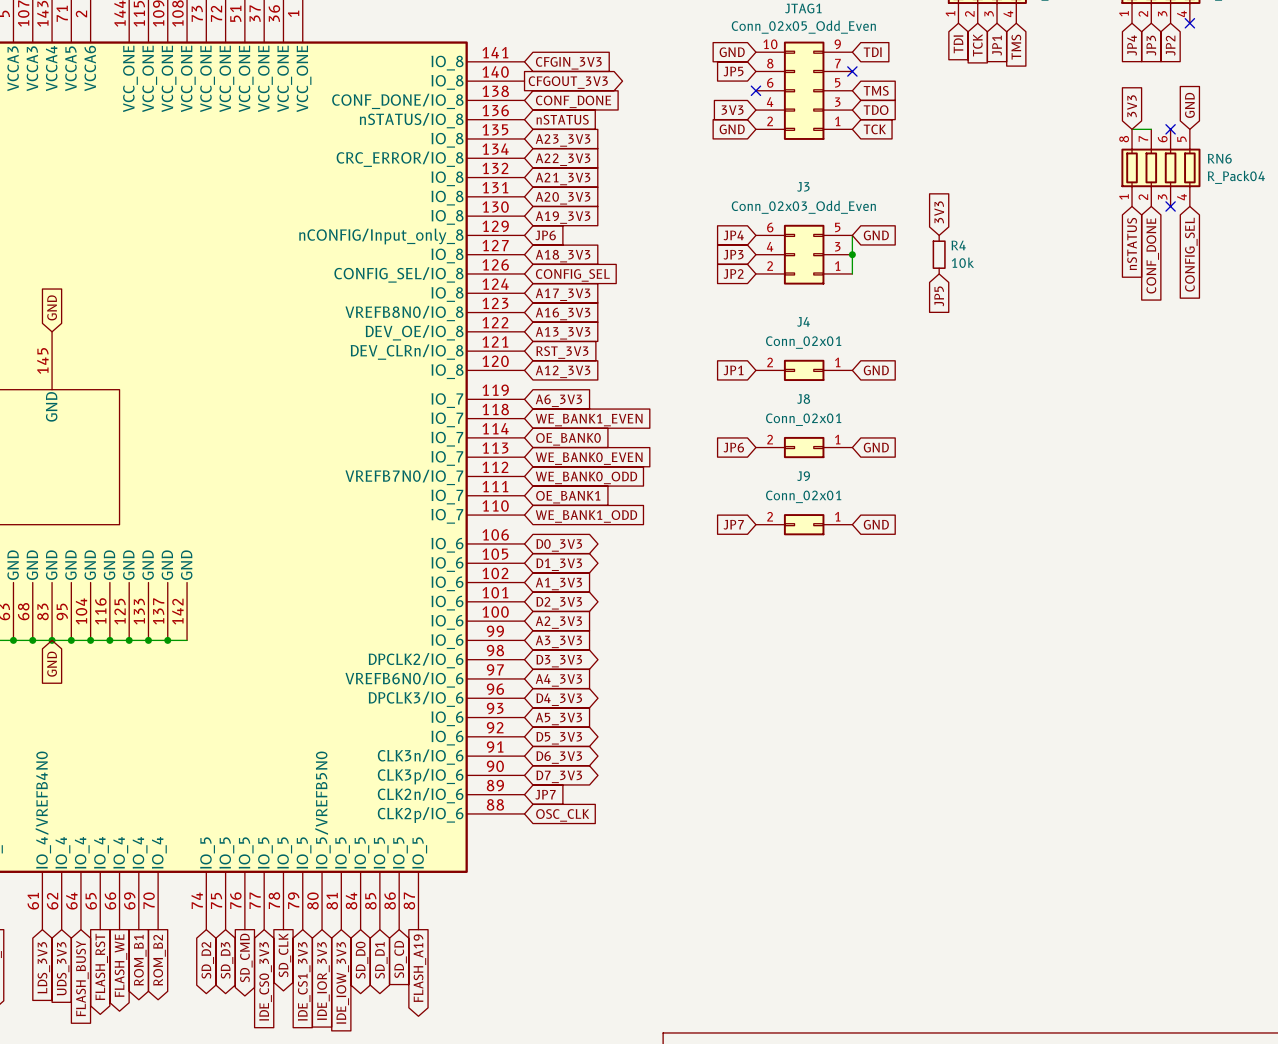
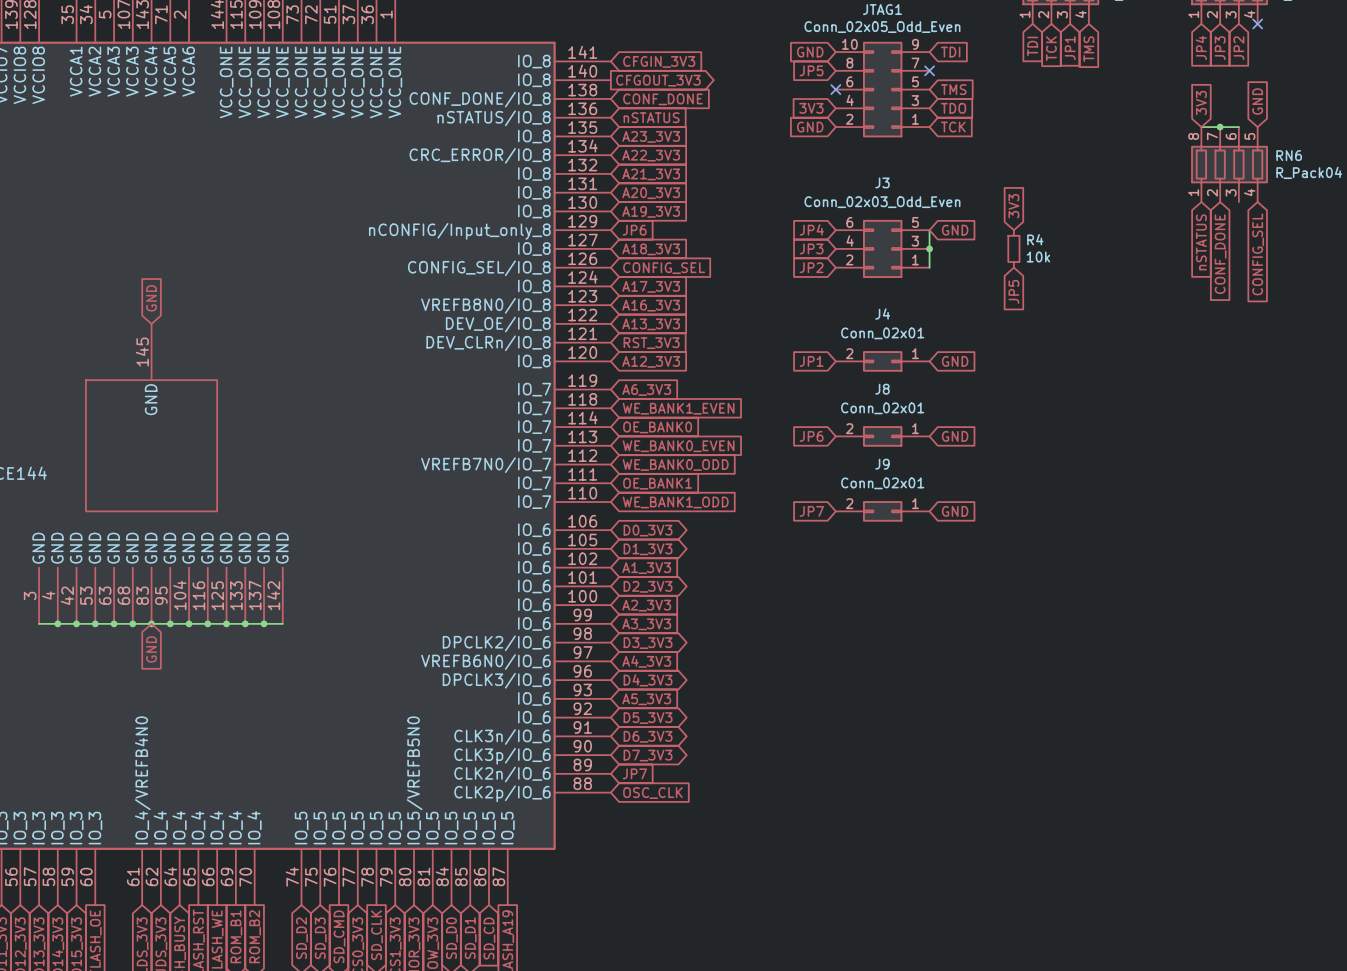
wire: none -> (1220, 127) (1238, 127)
junction: none -> (1220, 127)
no-connect mark: (1170, 129) -> none
no-connect mark: (1170, 206) -> none

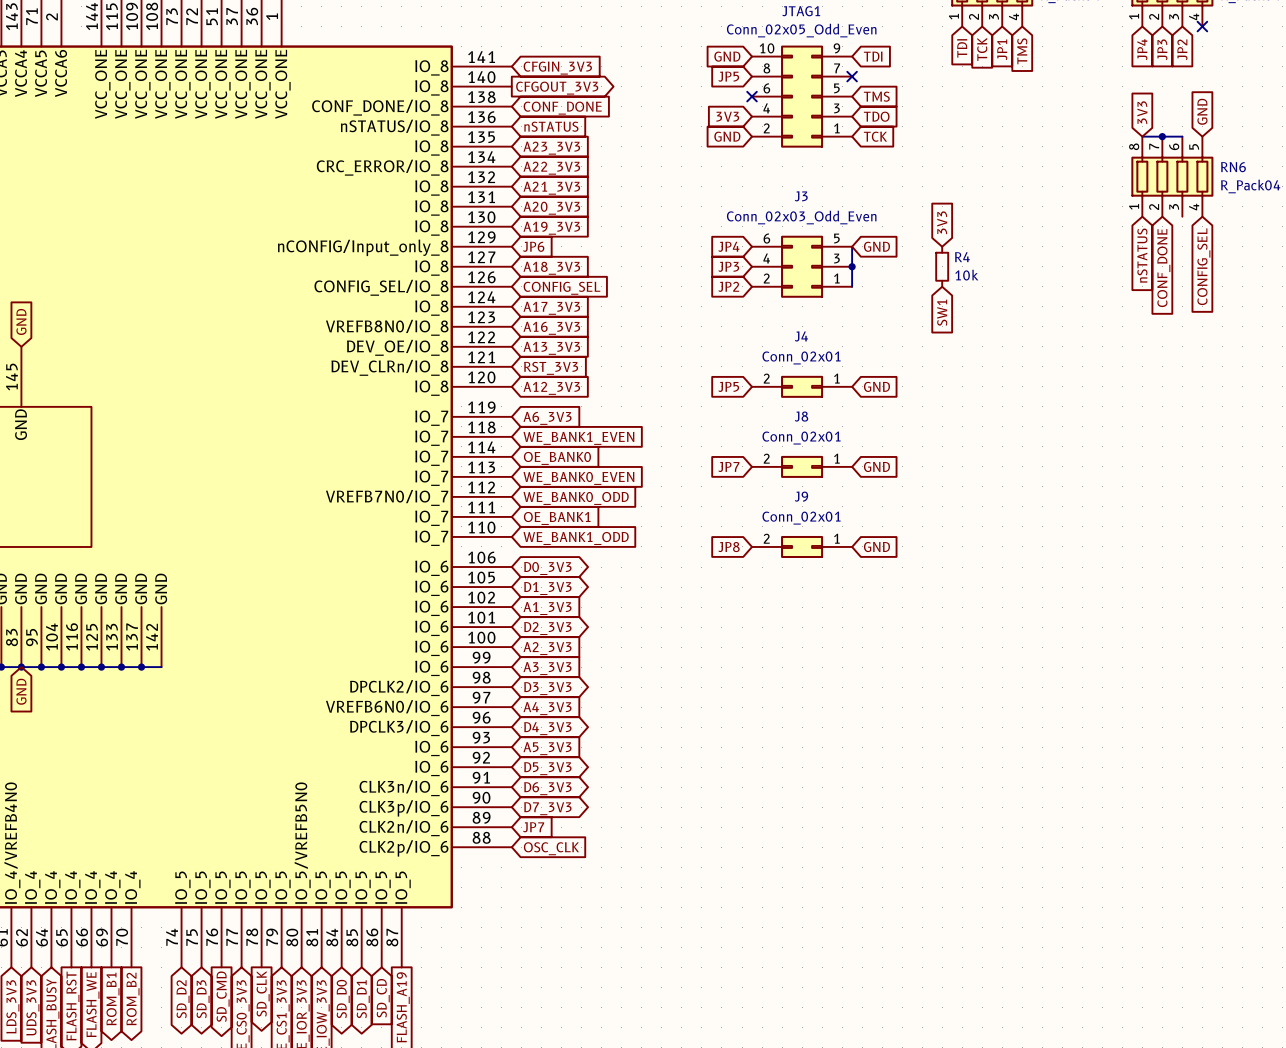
global label: JP5 (1013, 291) -> SW1 (942, 312)
global label: JP1 (811, 361) -> JP5 (728, 386)
global label: JP6 (811, 436) -> JP7 (728, 466)
global label: JP7 (811, 511) -> JP8 (729, 547)

